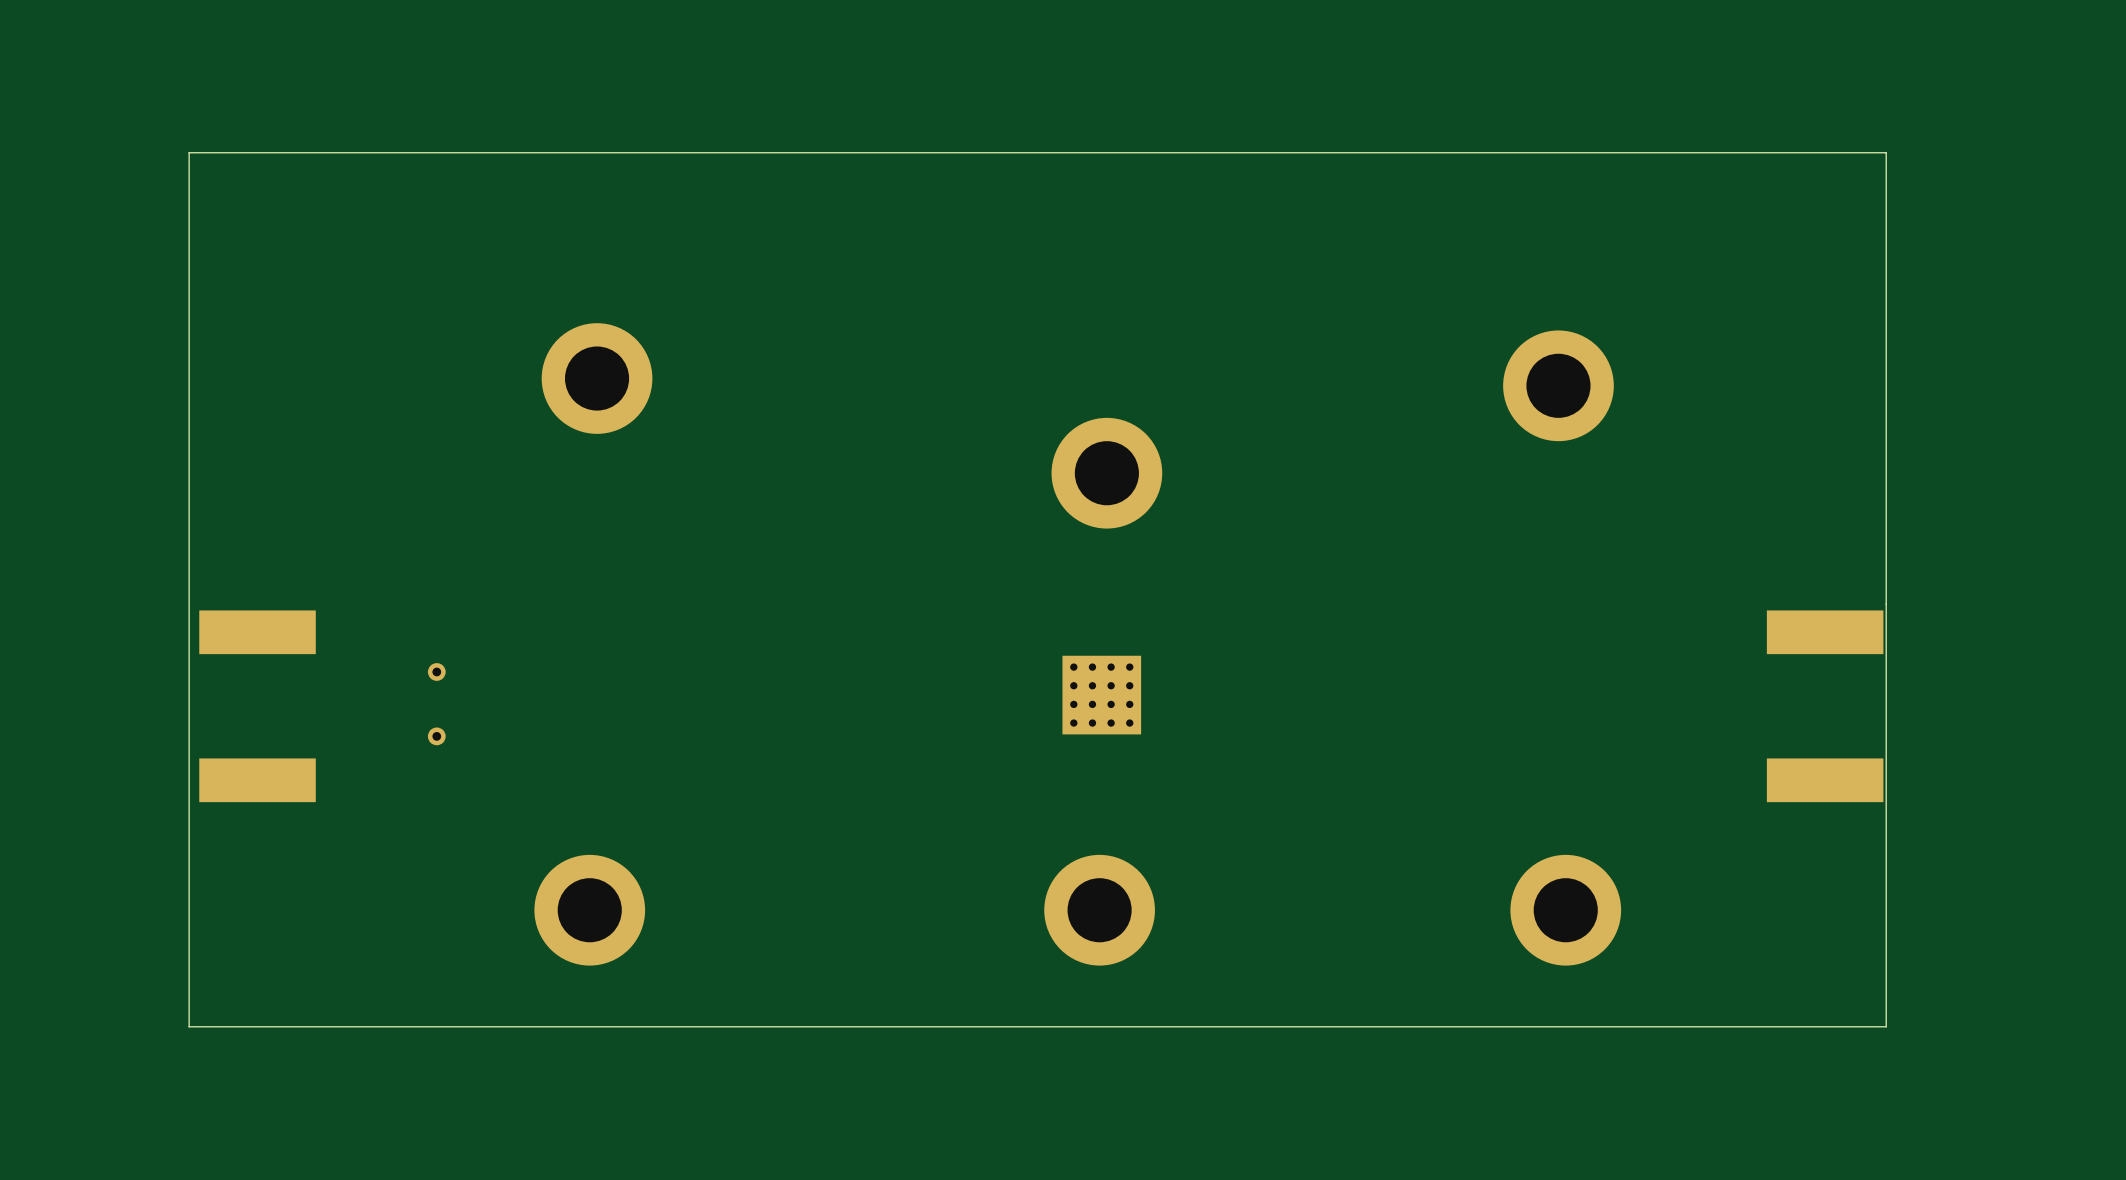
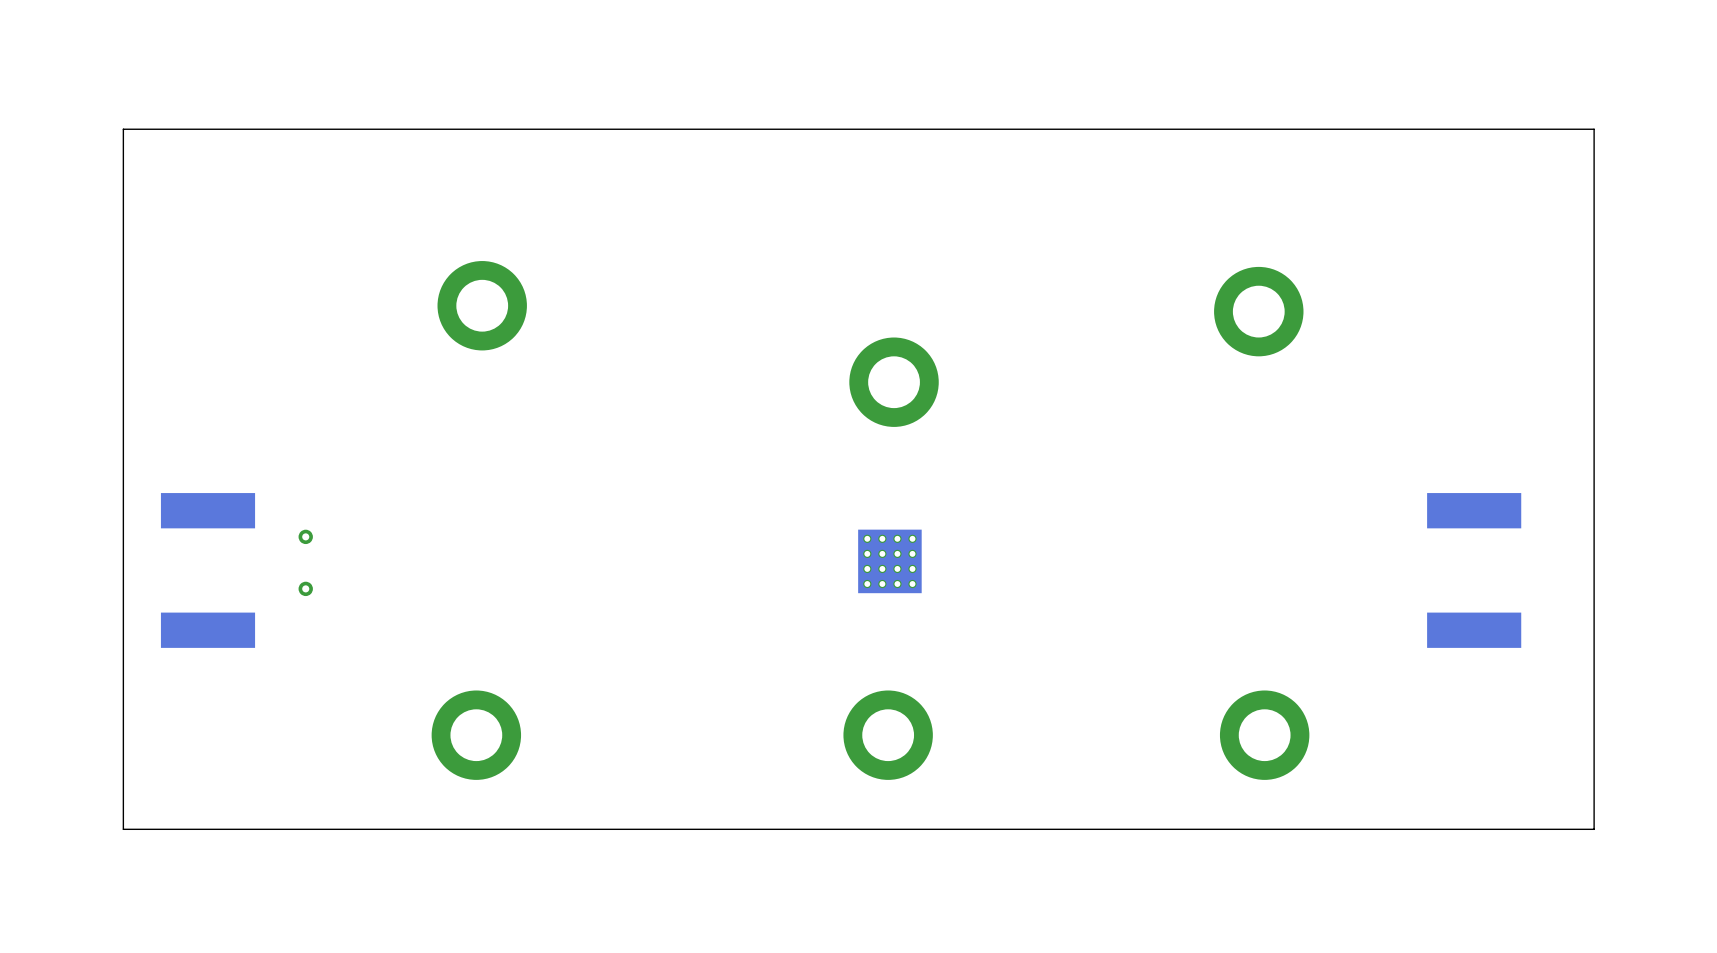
part position: (436, 704) -> (305, 562)
board edge: (1886, 1026) (1886, 152) (189, 152) (189, 1026) -> (1523, 829) (1594, 829) (1594, 129) (123, 129) (123, 829) (152, 829)

